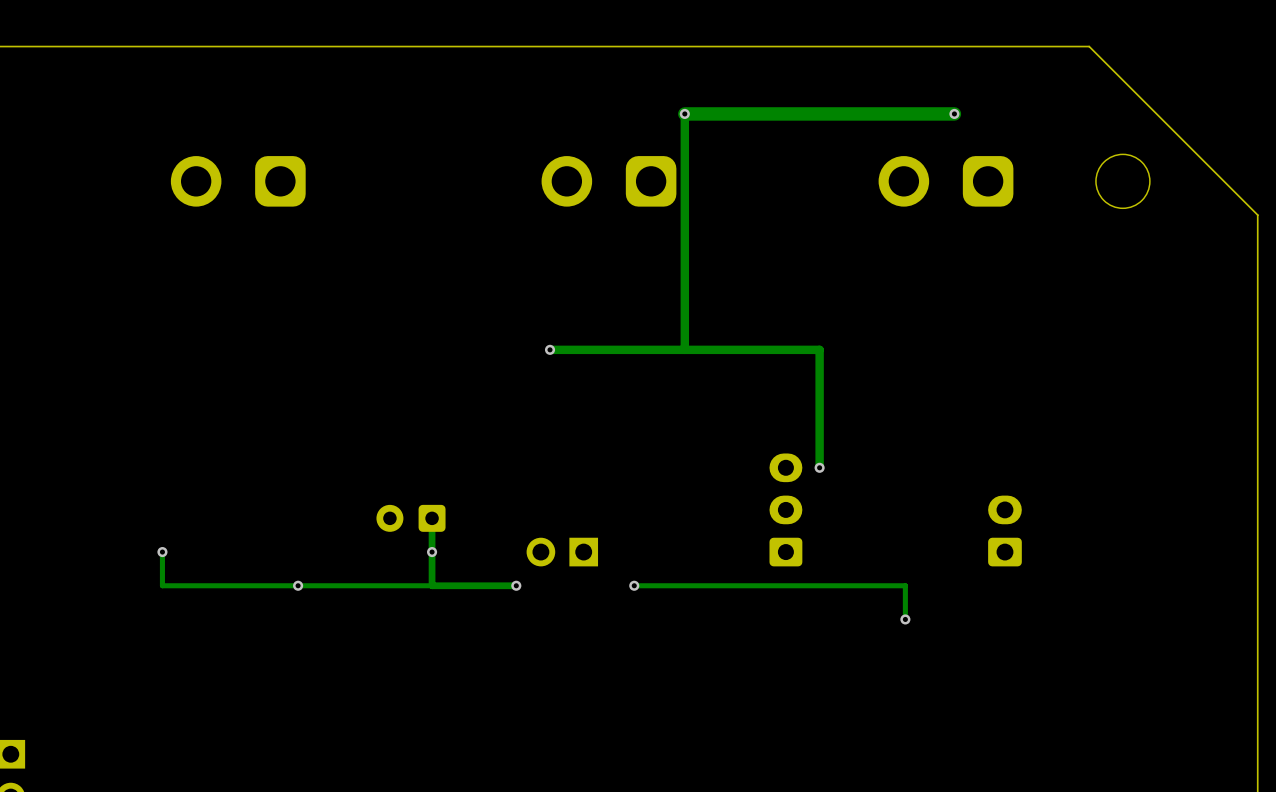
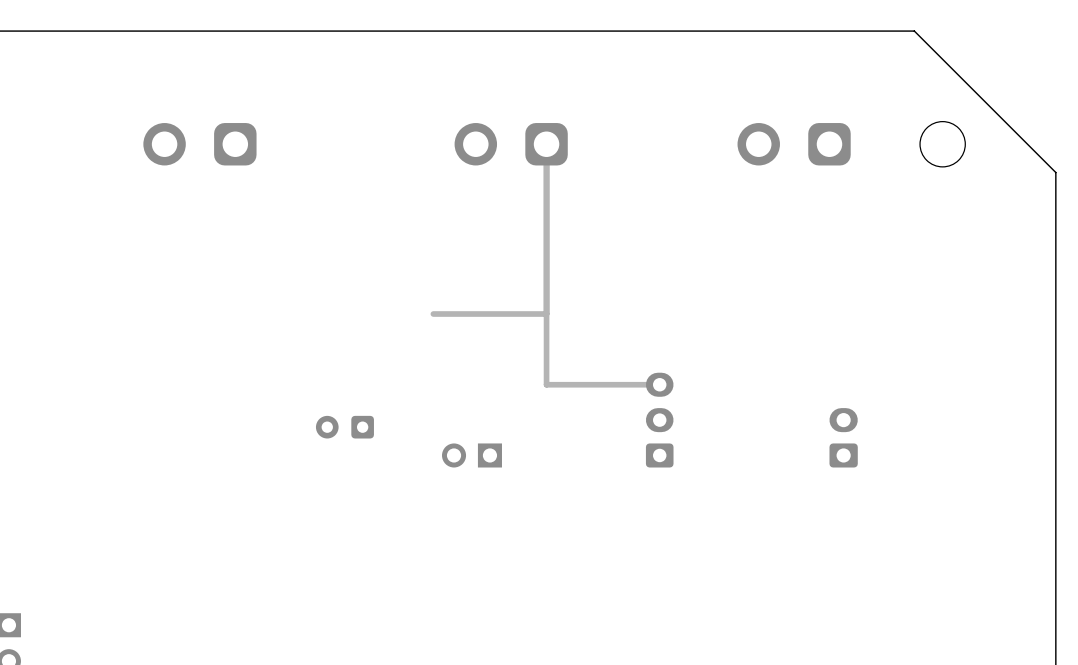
via: (684, 113) -> none
track: (954, 113) (684, 113) (684, 349) -> none
via: (954, 113) -> none
track: none -> (546, 144) (546, 384) (659, 384)
track: (550, 349) (819, 349) (819, 467) -> none
via: (550, 349) -> none
track: none -> (546, 314) (433, 314)
via: (819, 467) -> none
track: (432, 518) (432, 585) -> none
track: (162, 552) (162, 585) (432, 585) -> none
via: (162, 552) -> none
via: (432, 552) -> none
via: (298, 585) -> none
track: (516, 585) (432, 585) -> none
via: (516, 585) -> none
track: (634, 585) (905, 585) (905, 619) -> none
via: (634, 585) -> none
via: (905, 619) -> none

